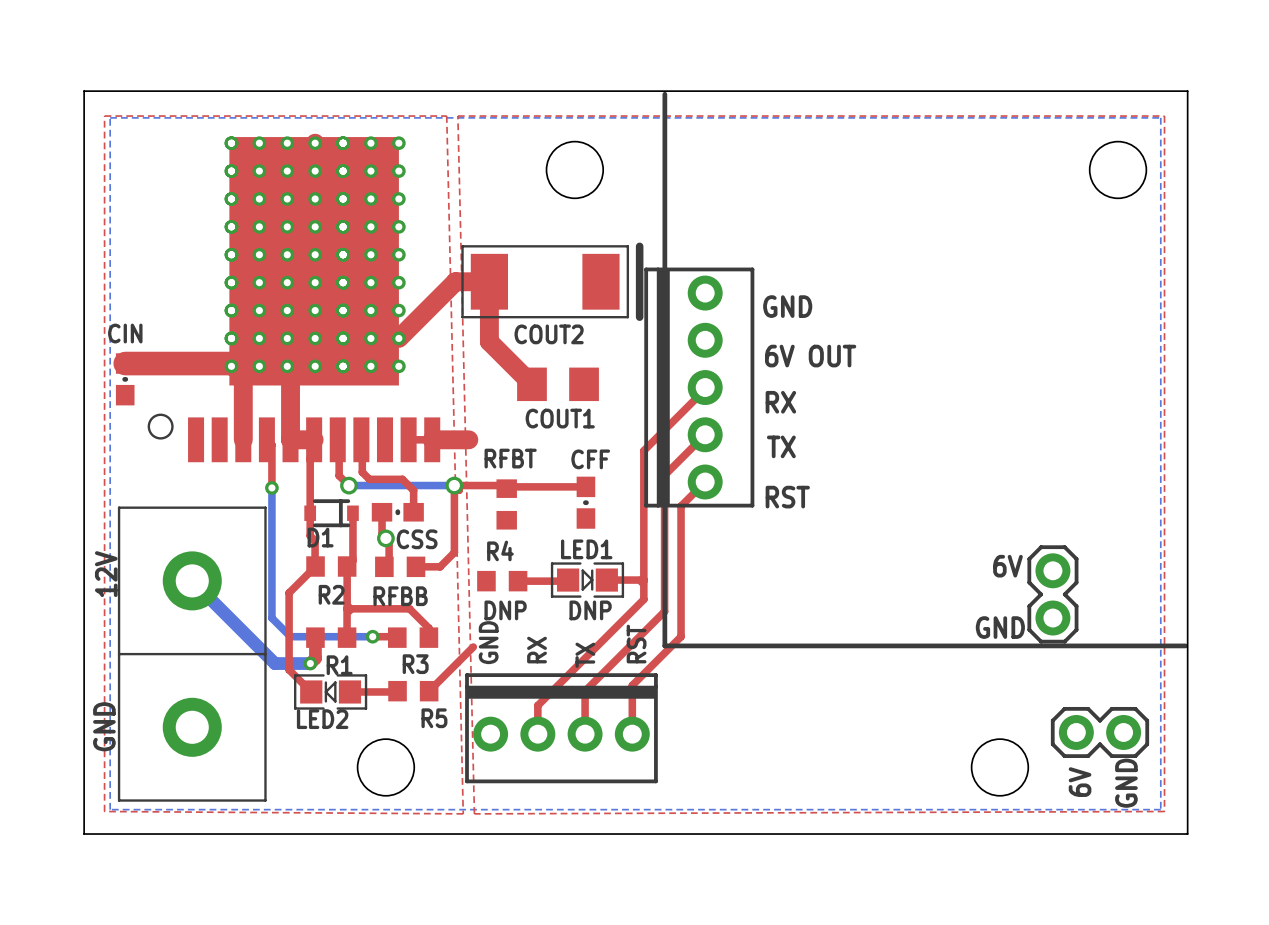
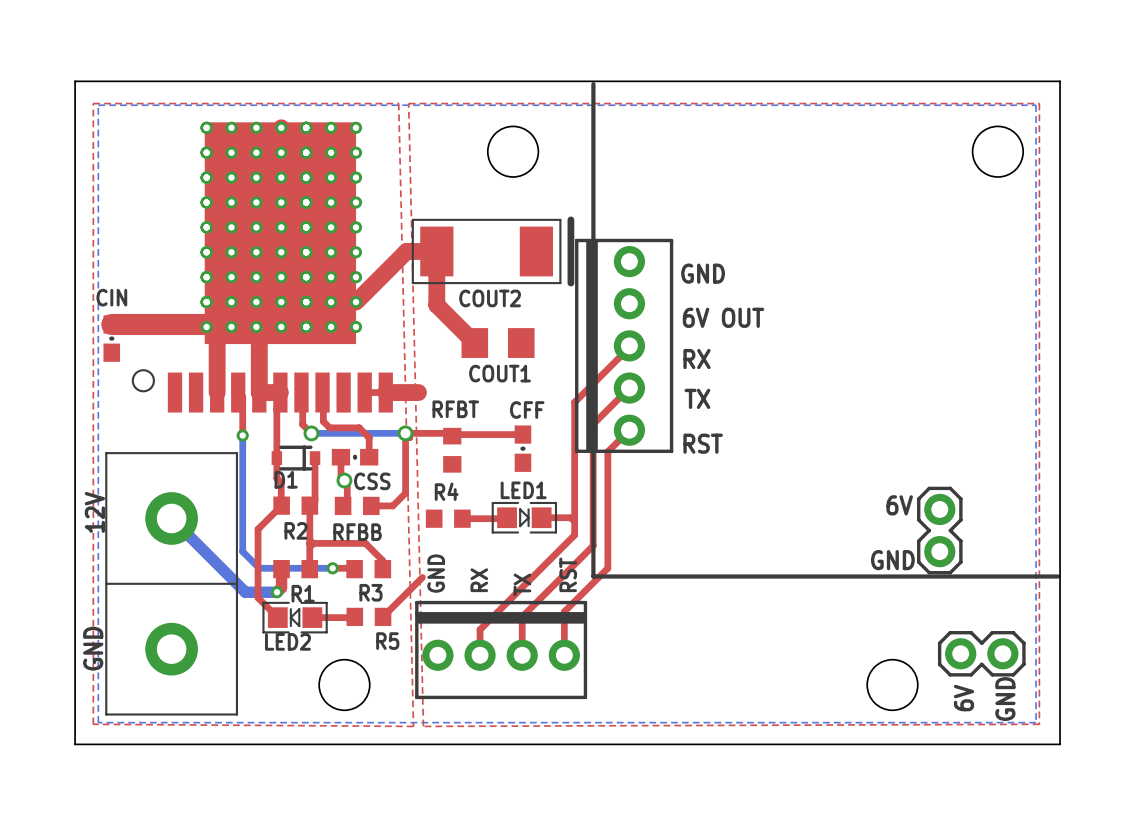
text: DNP (505, 610) -> none
text: DNP (590, 610) -> none

